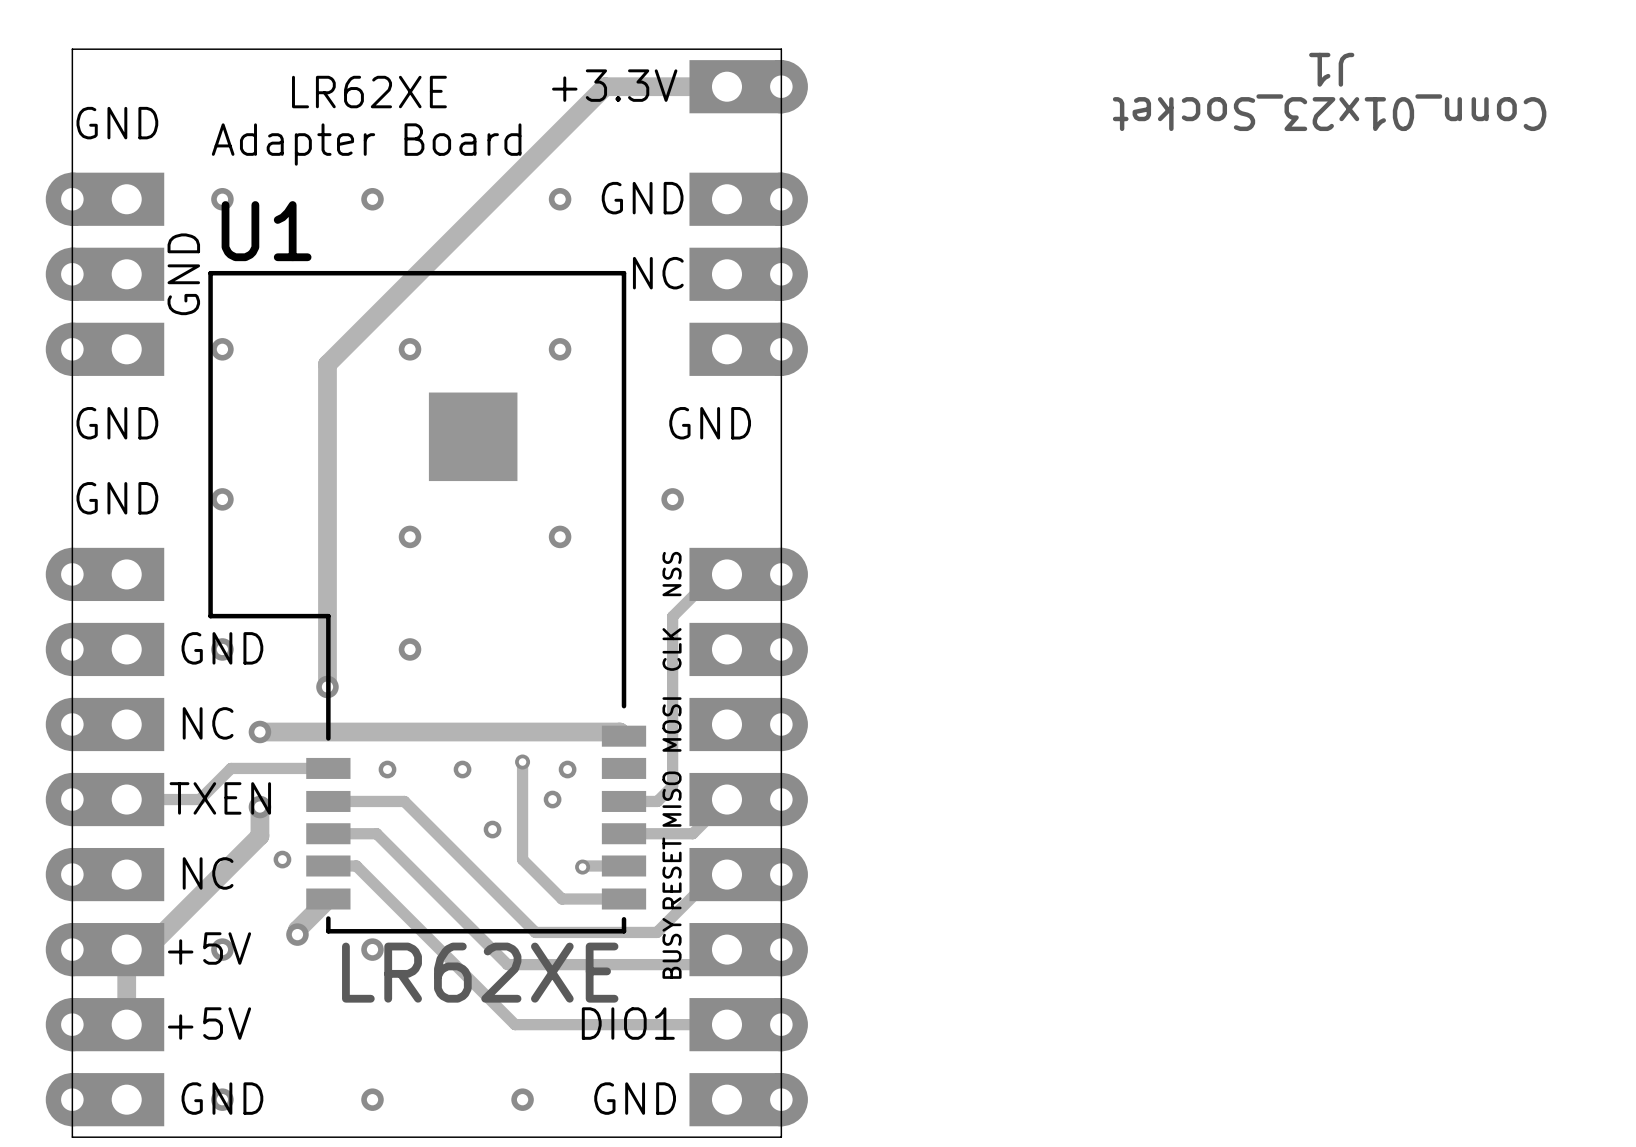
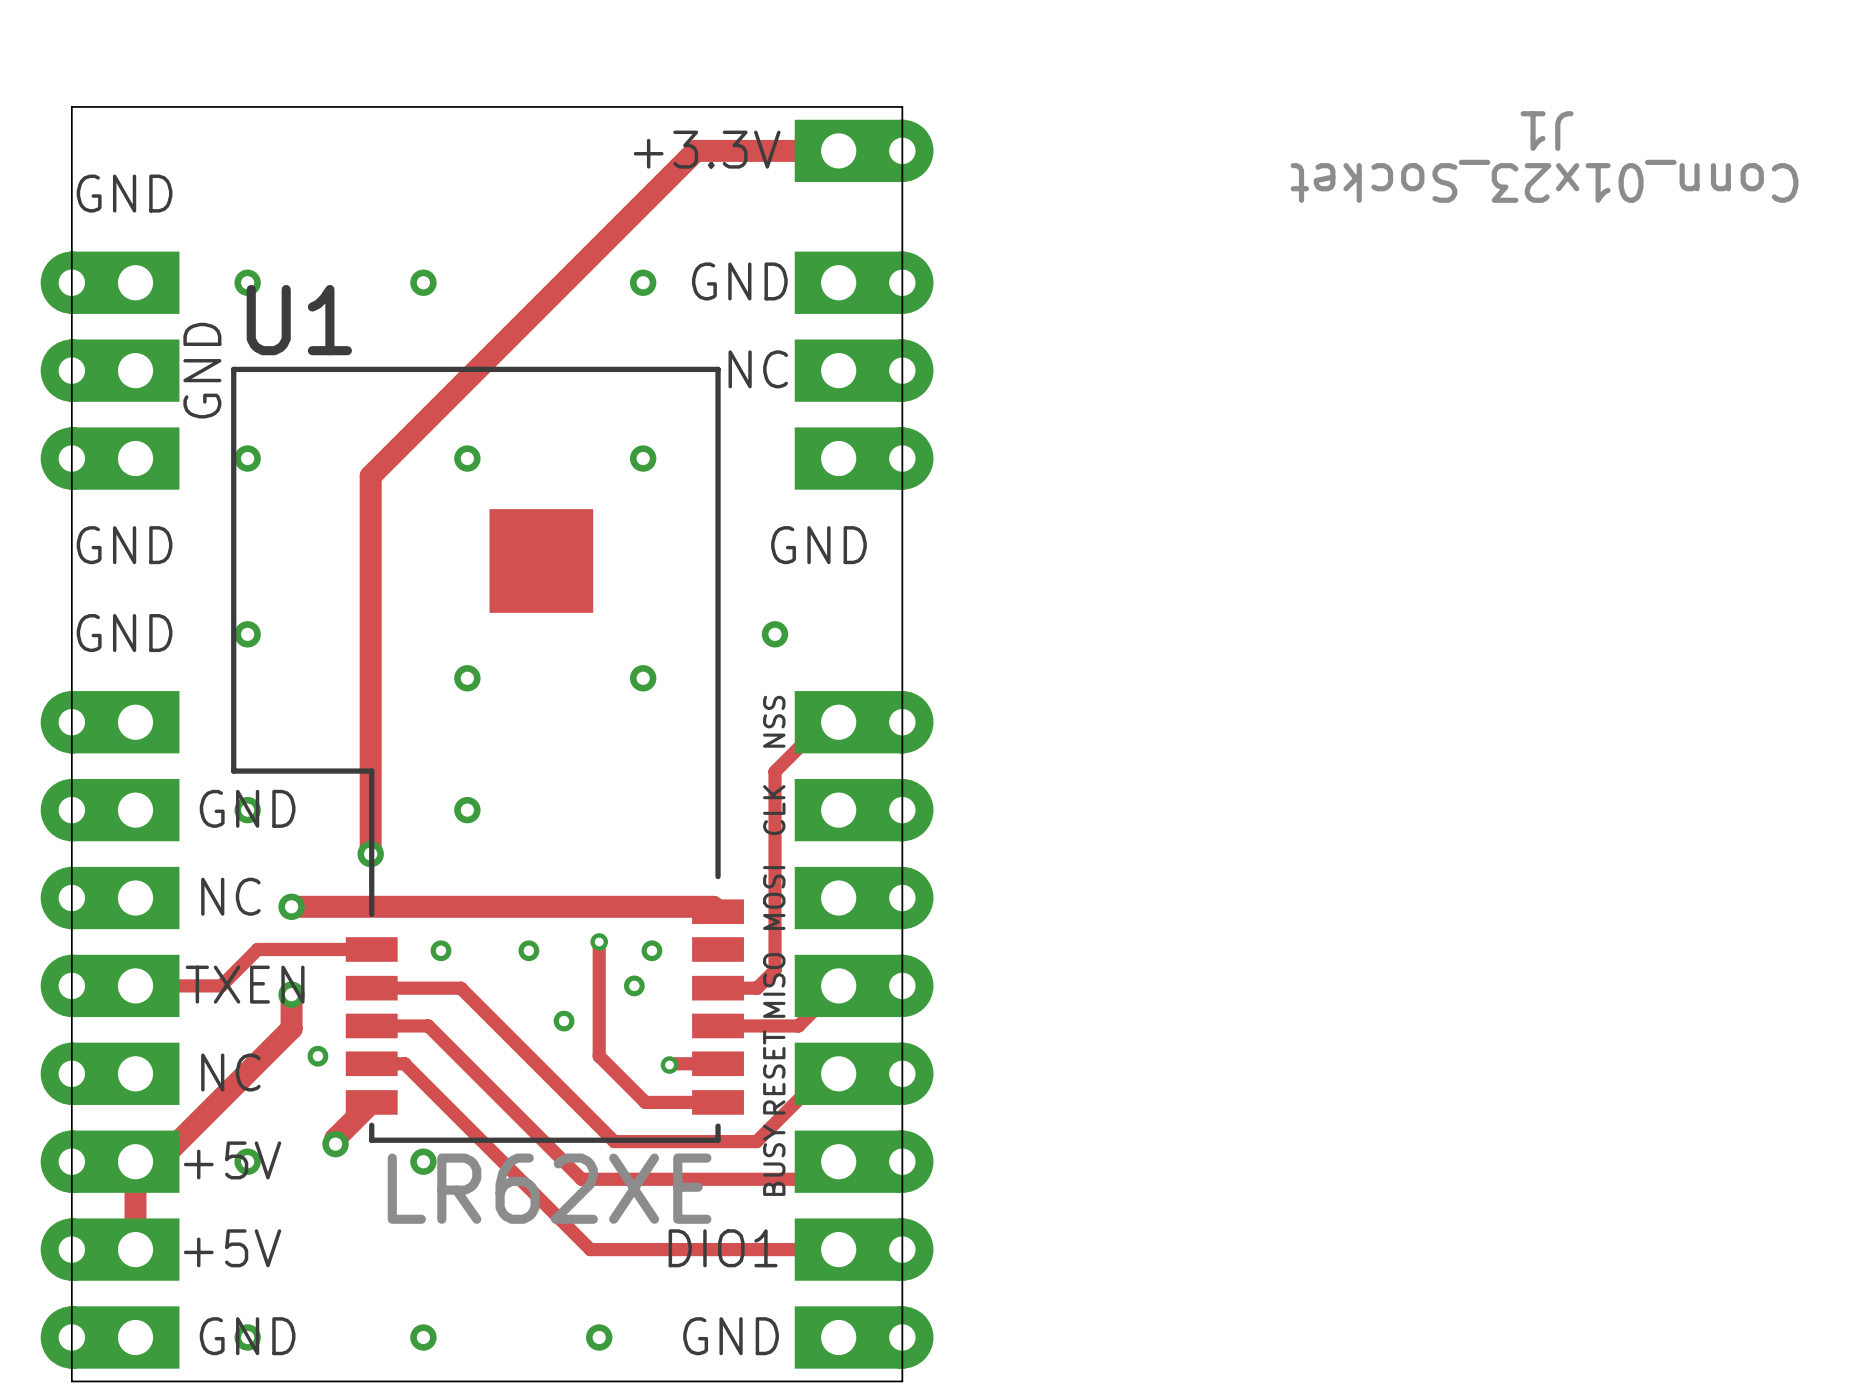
text: LR62XE (369, 92) -> none
text: Adapter Board (366, 144) -> none

